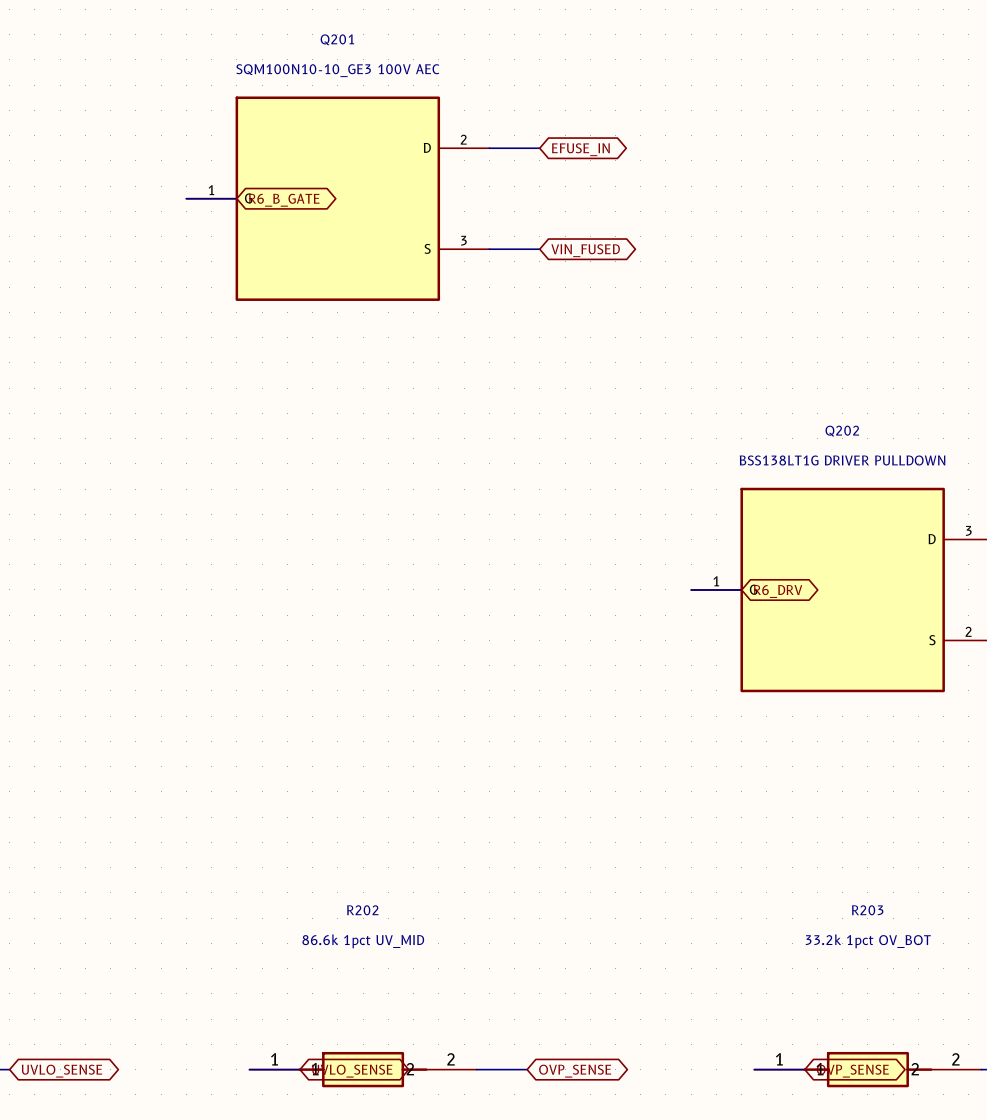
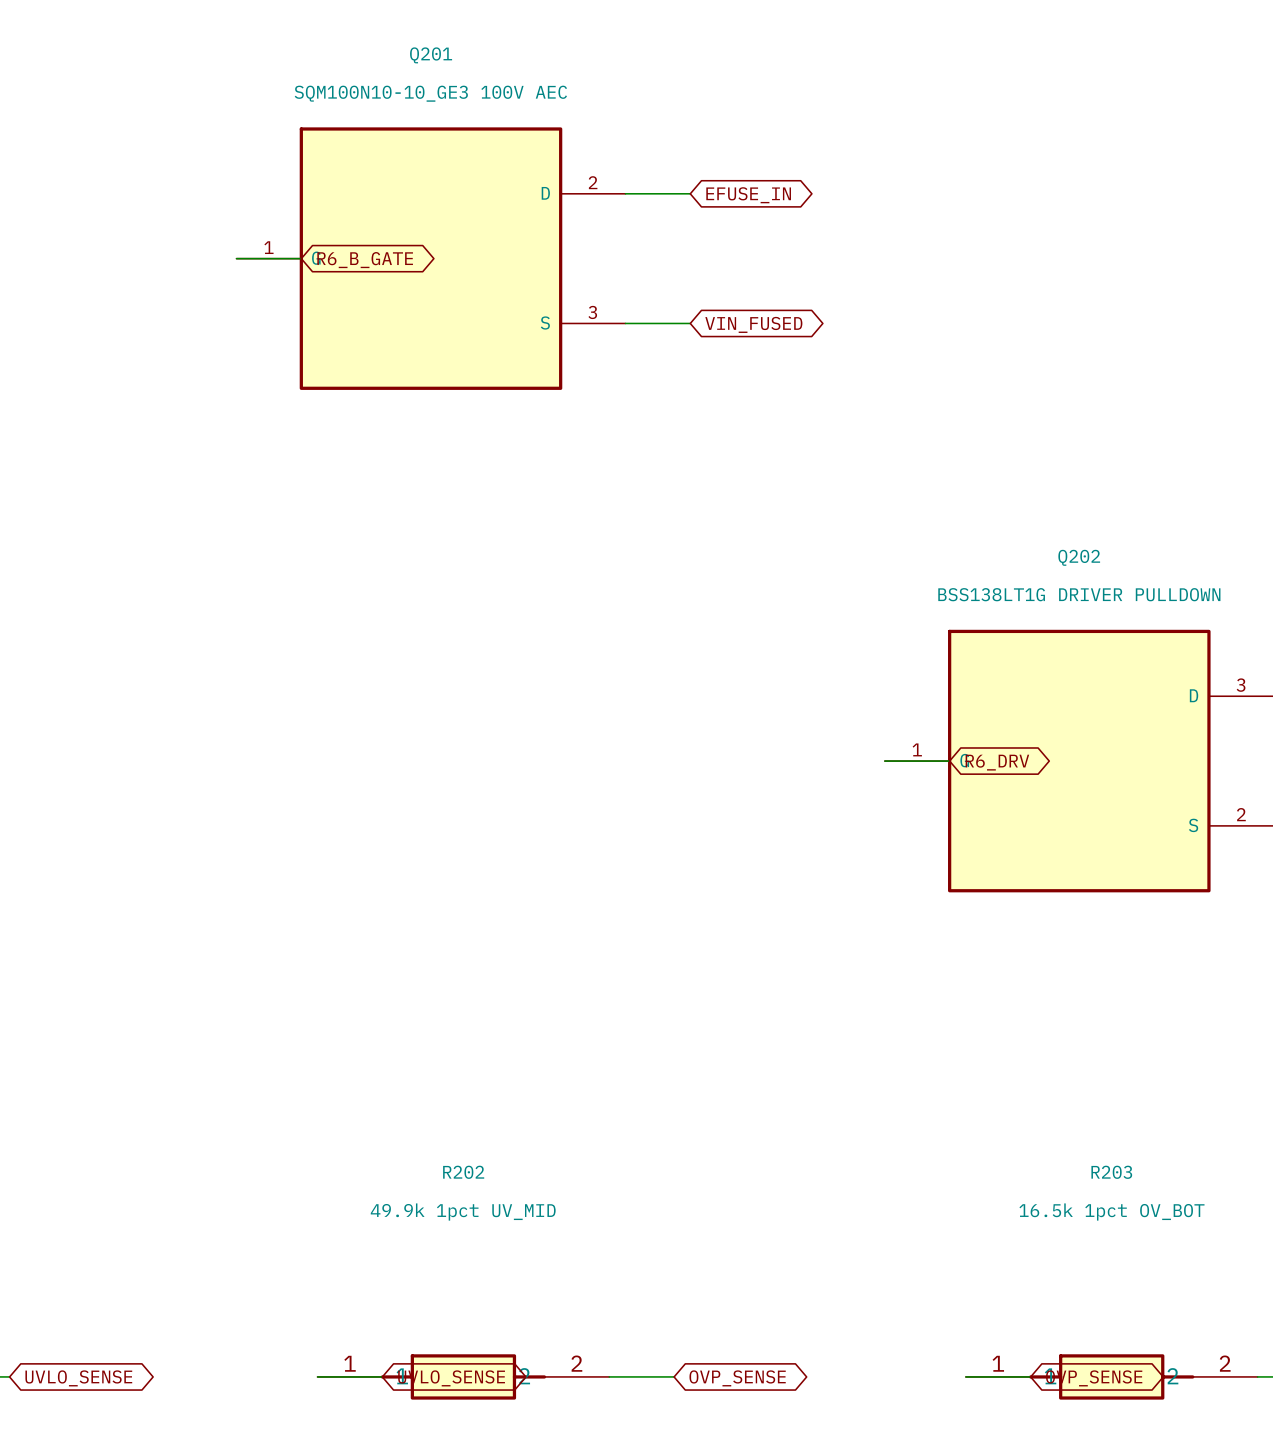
R202 value: 86.6k 1pct UV_MID (363, 941) -> 49.9k 1pct UV_MID (463, 1212)
R203 value: 33.2k 1pct OV_BOT (868, 941) -> 16.5k 1pct OV_BOT (1111, 1212)

